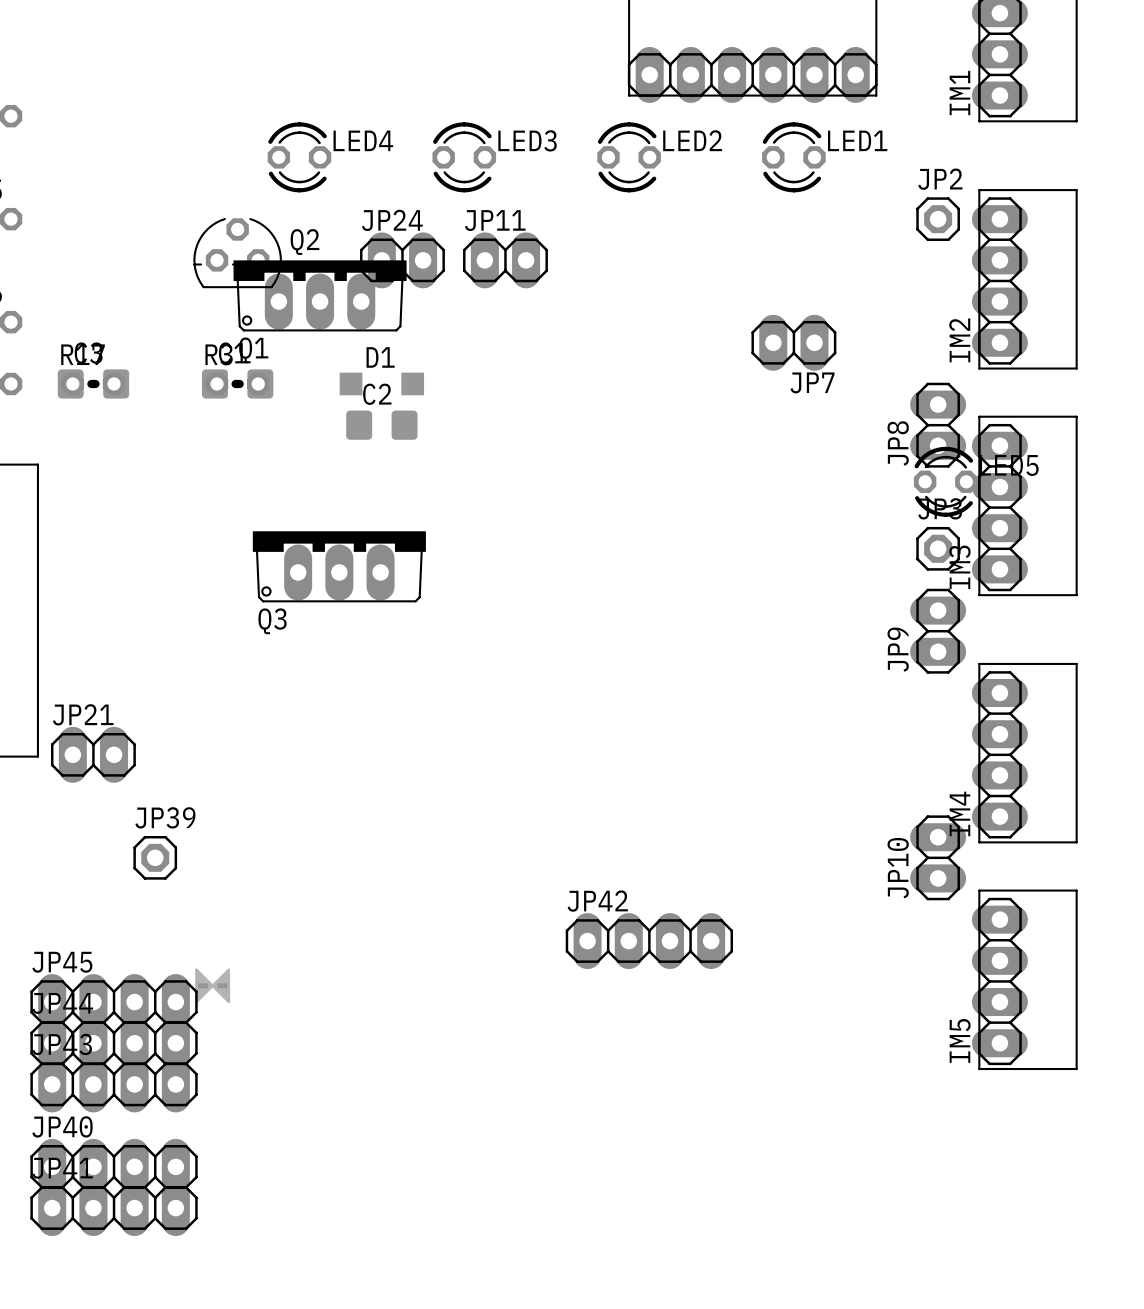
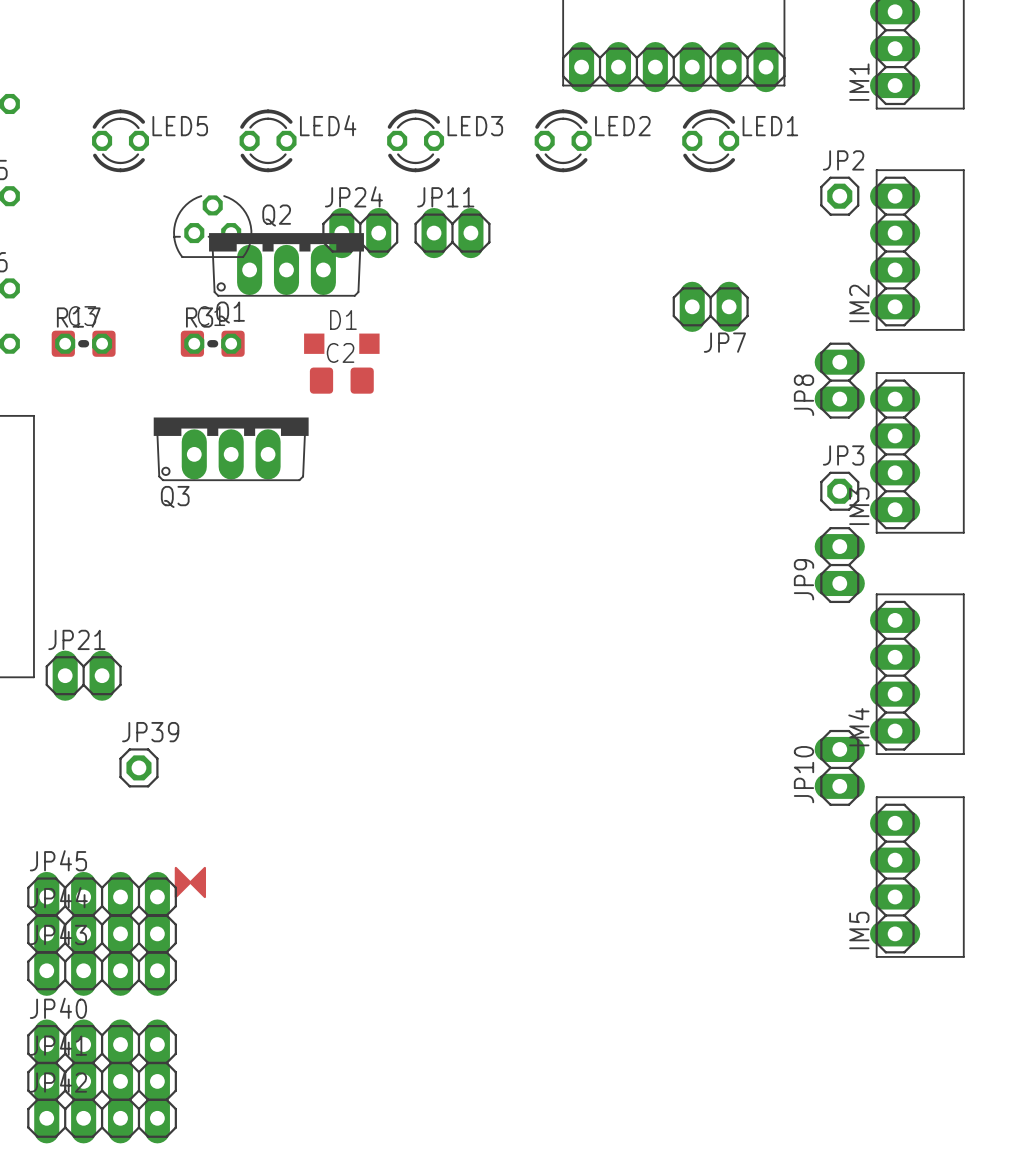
LED5 position: (945, 481) -> (120, 140)
Q3 position: (339, 566) -> (231, 449)
JP42 position: (649, 941) -> (102, 1118)

